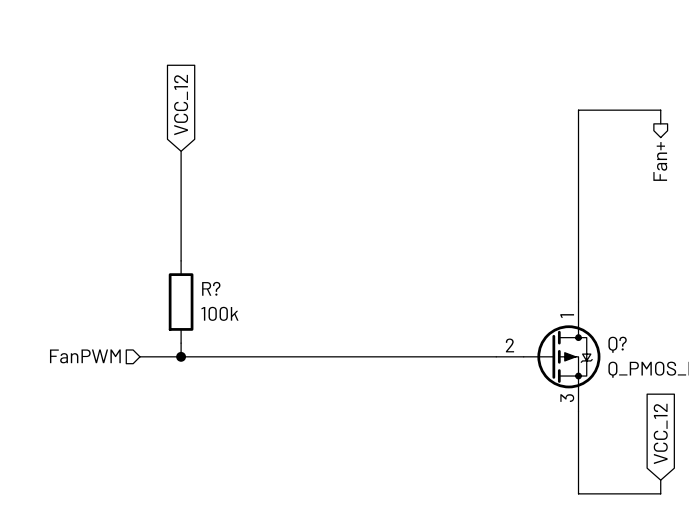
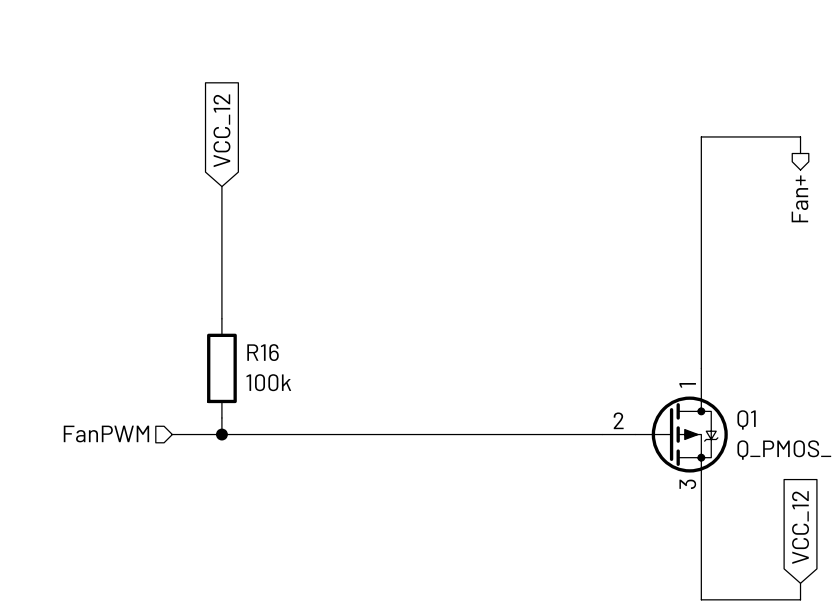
R? name: R? (211, 288) -> R16 (263, 352)
Q? name: Q? (617, 344) -> Q1 (746, 419)

